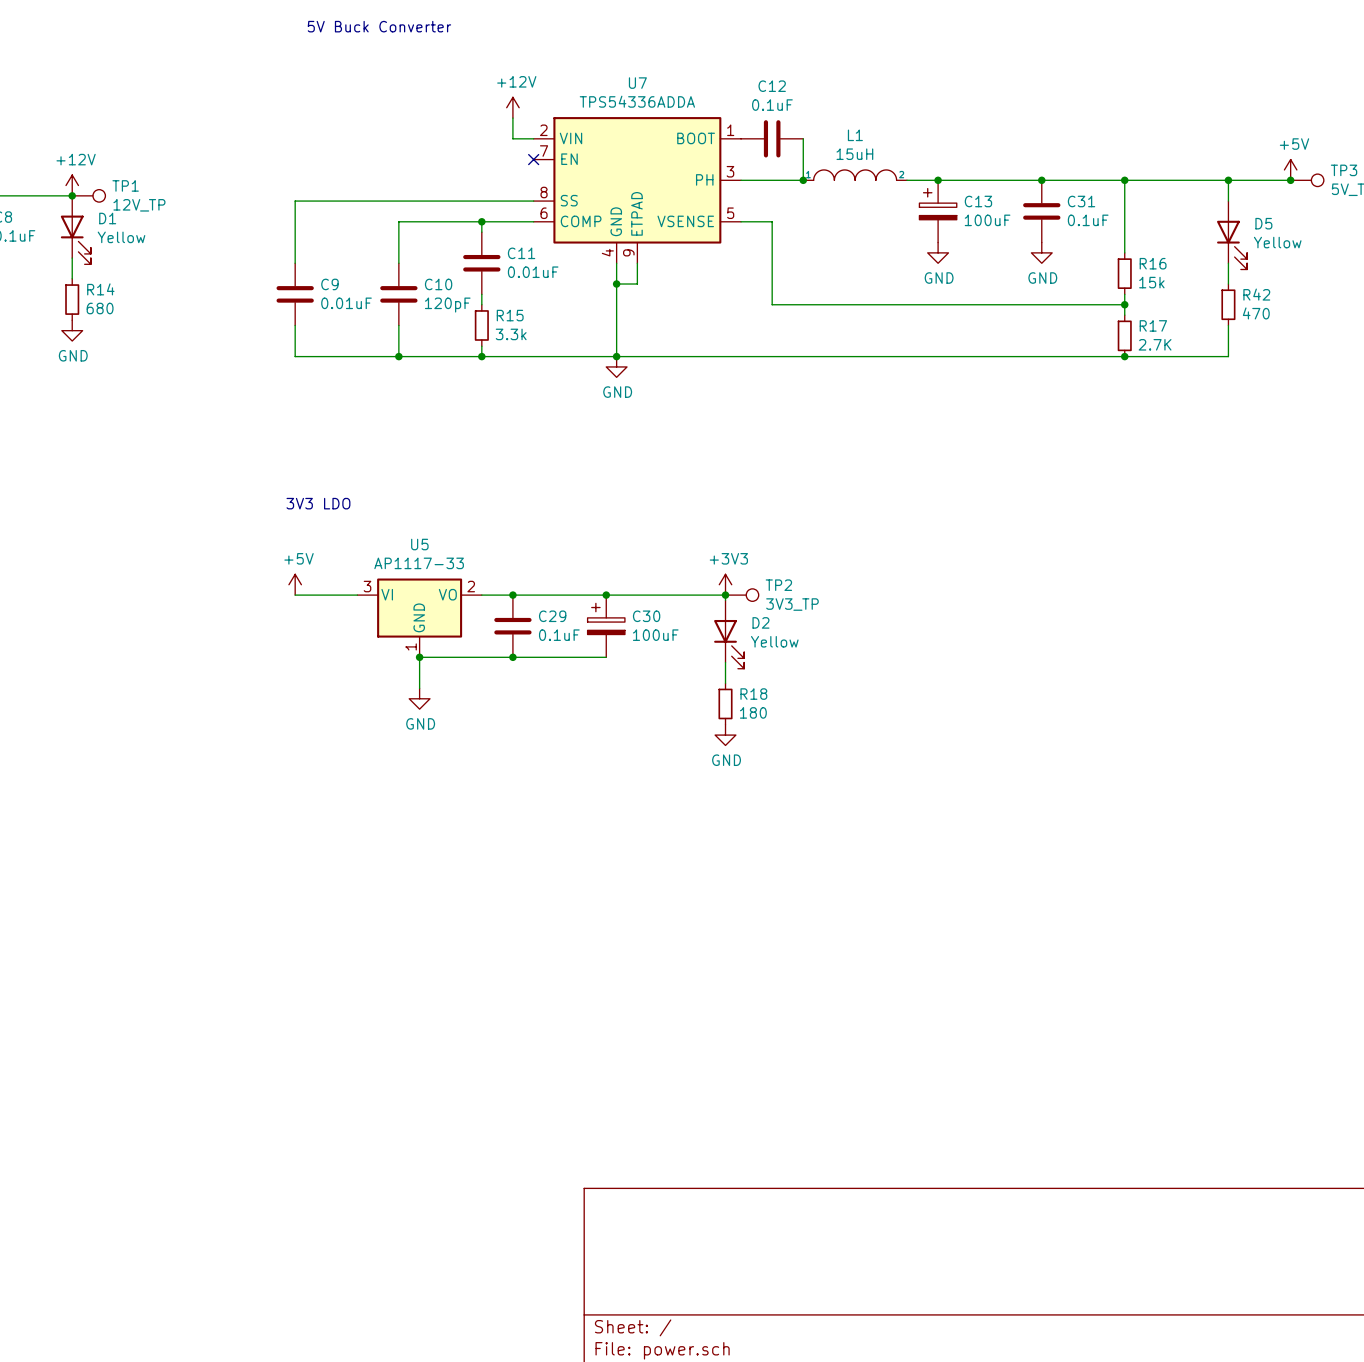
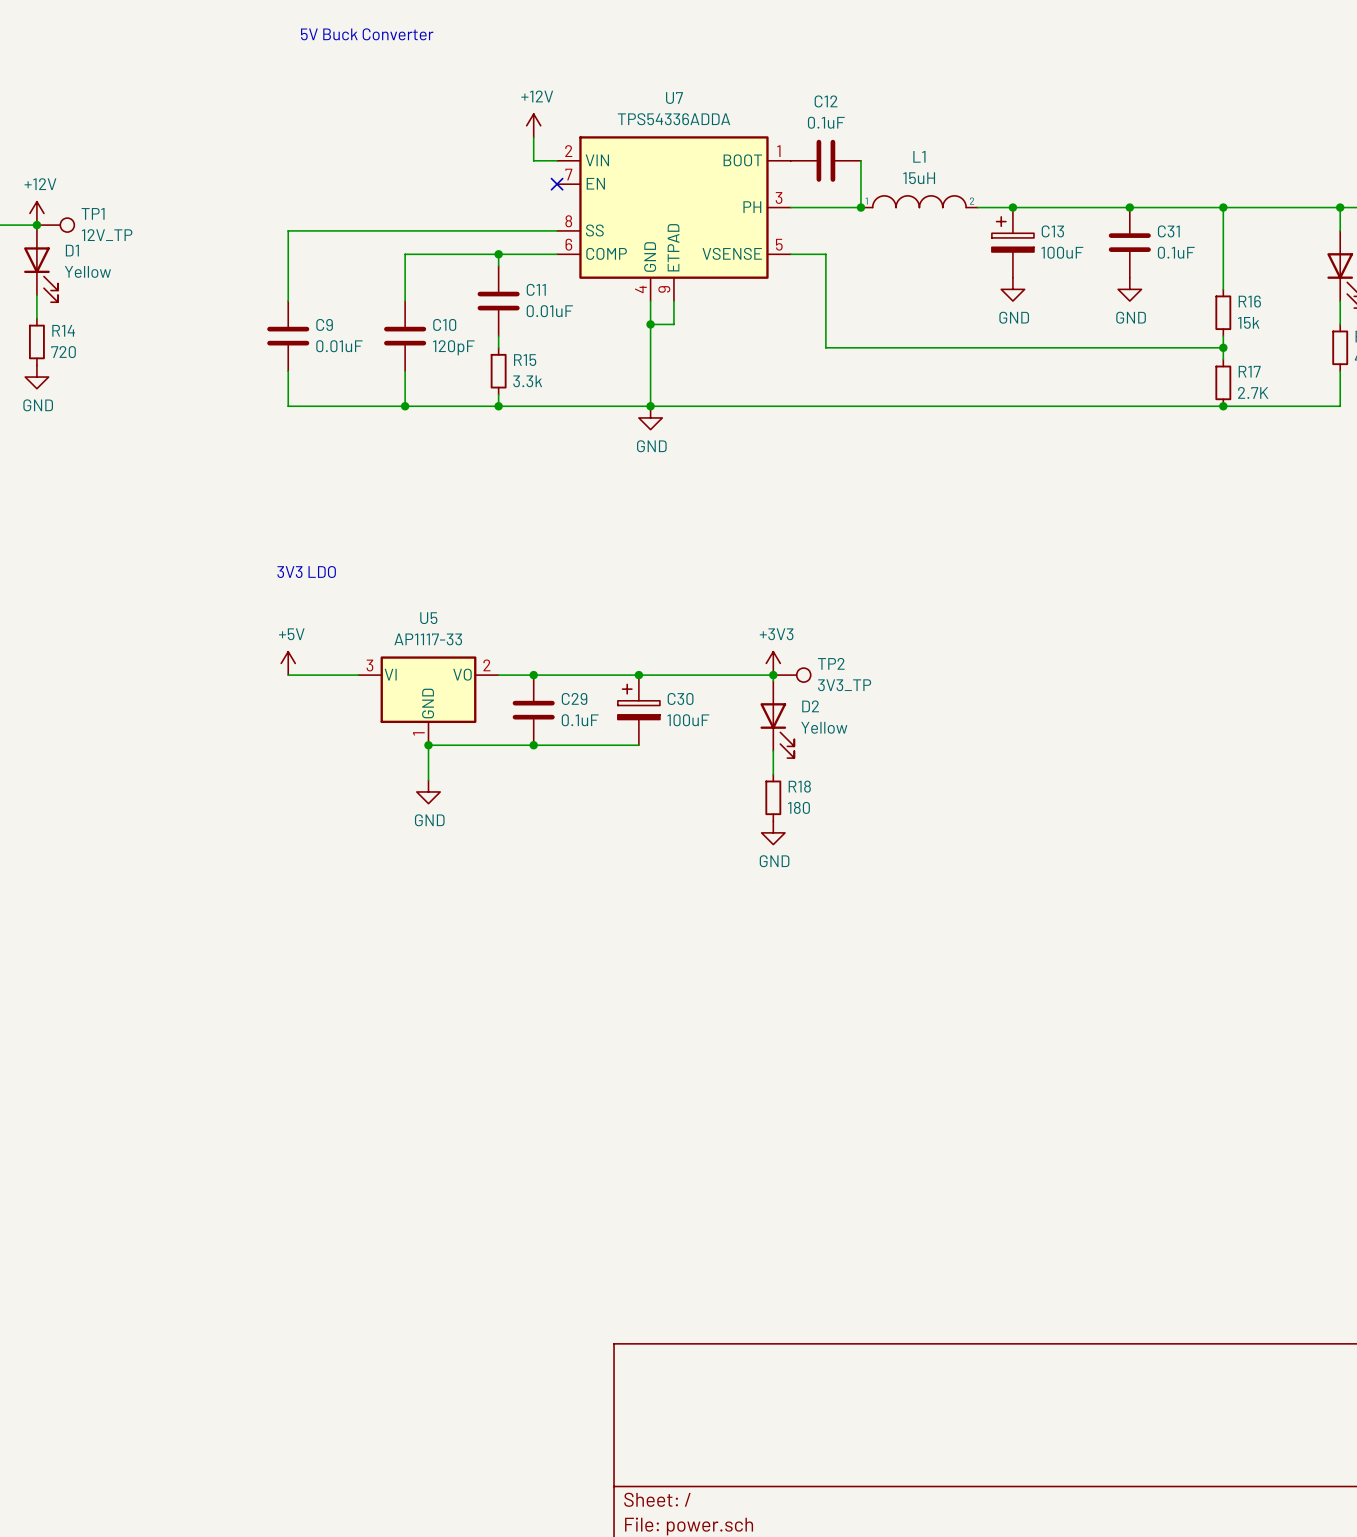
R14 value: 680 (100, 308) -> 720 (63, 352)

